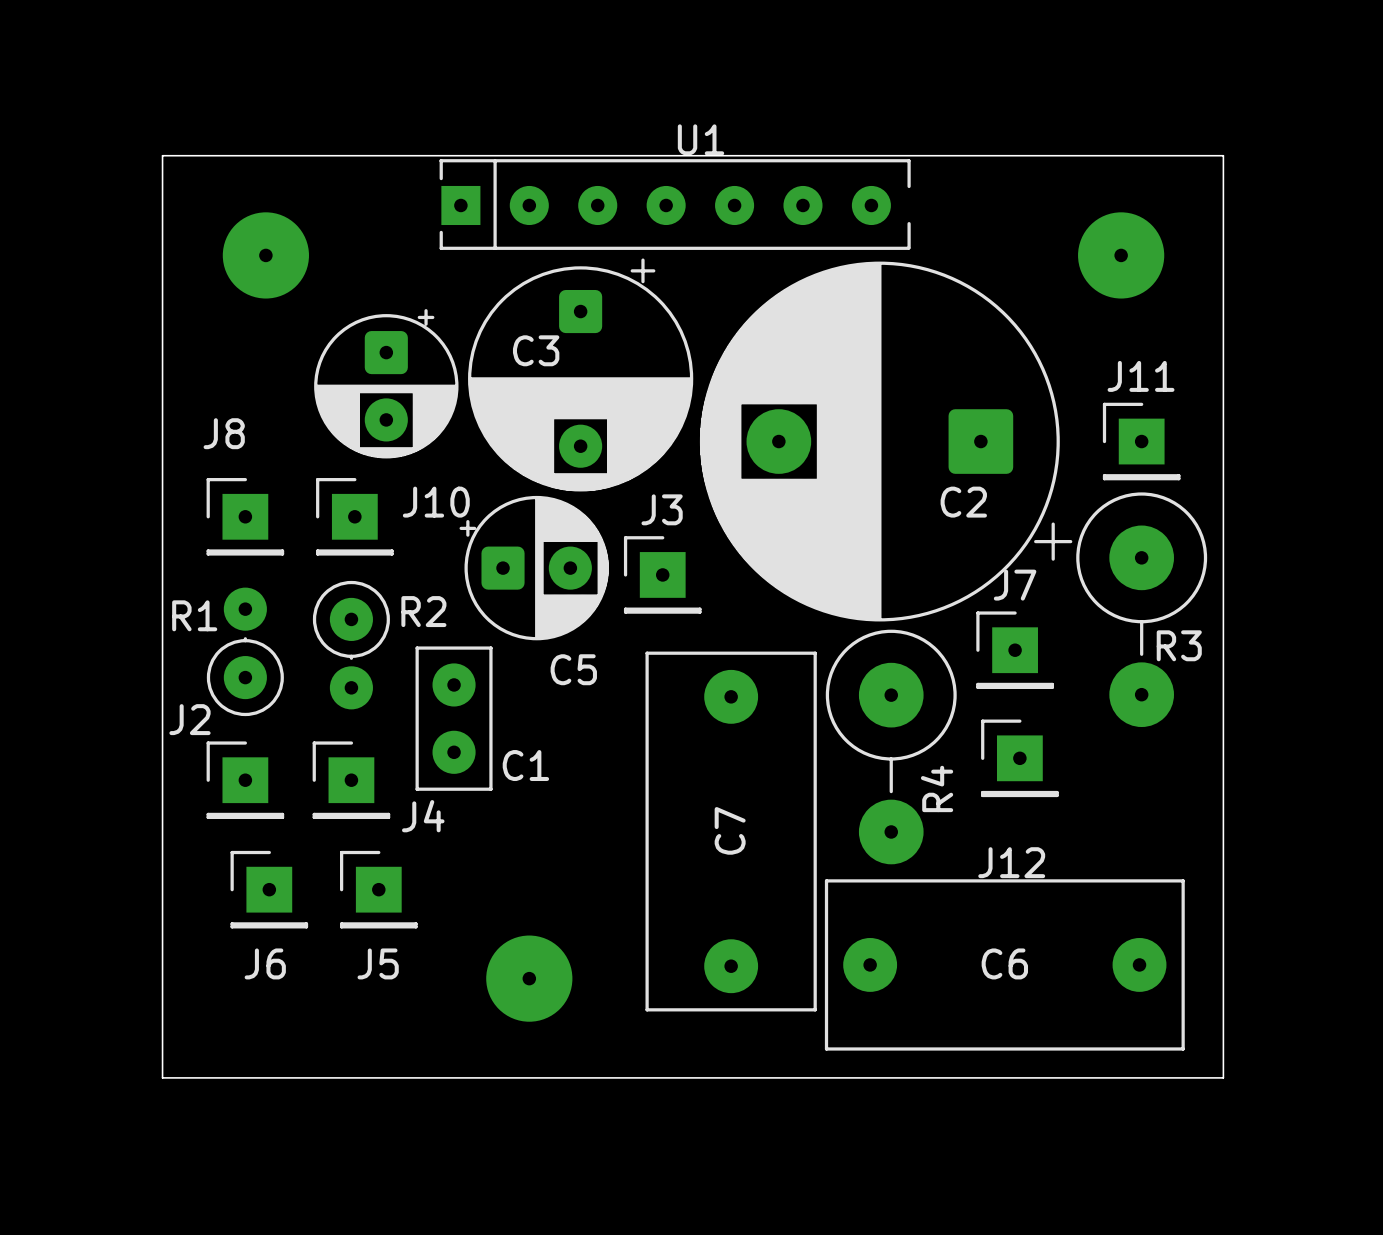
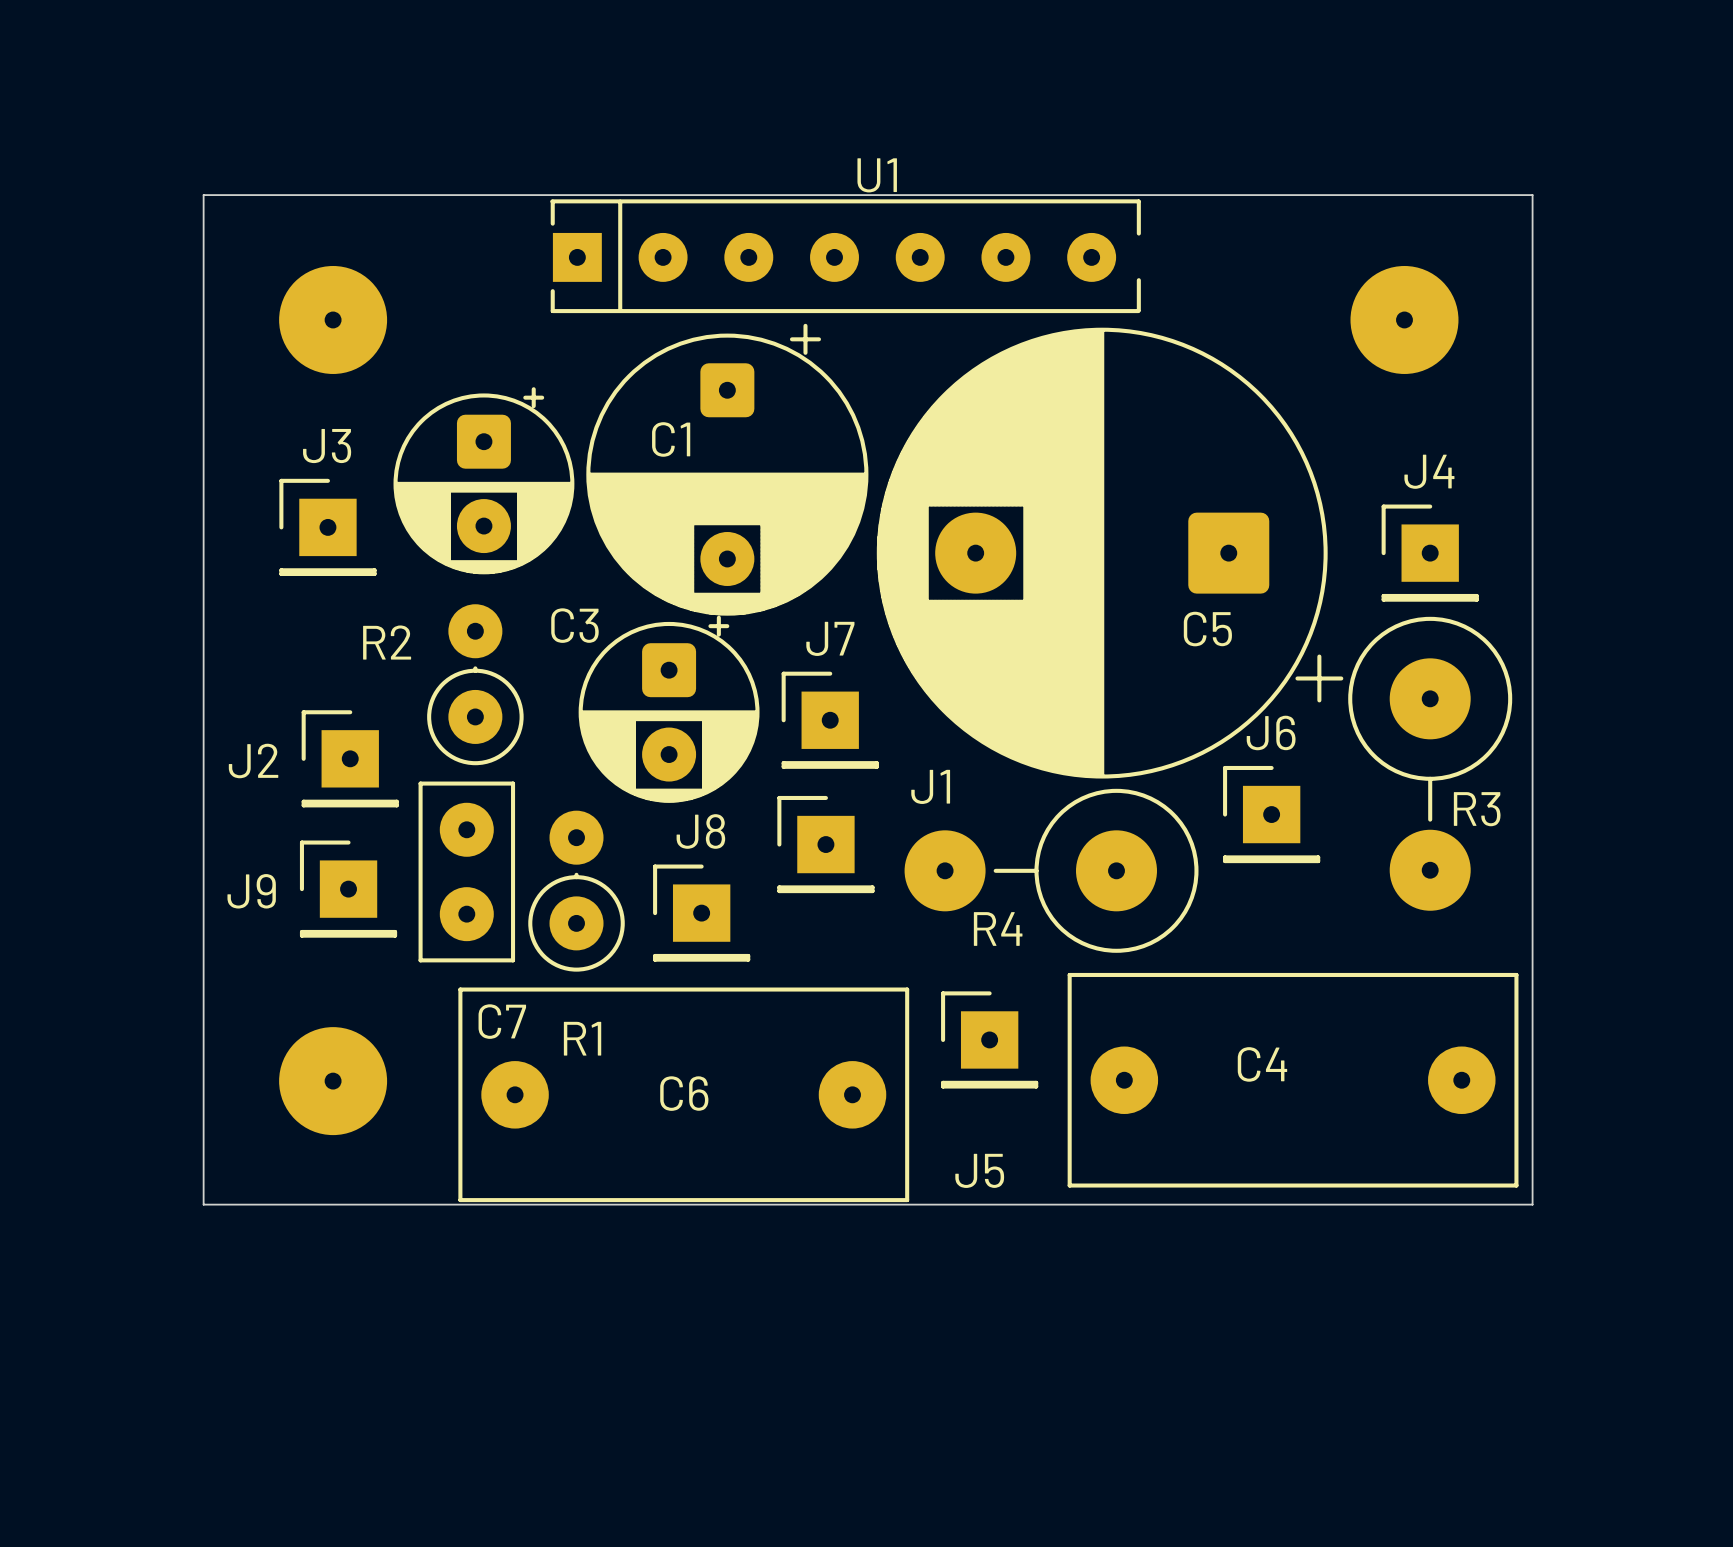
C3 name: C3 (536, 350) -> C1 (671, 439)
J11 name: J11 (1141, 376) -> J4 (1429, 471)
J3: none -> (327, 527)
J8 name position: J8 (224, 433) -> J8 (700, 831)
C2 name: C2 (963, 502) -> C5 (1207, 629)
J3 name: J3 (662, 509) -> J7 (830, 638)
J8 position: (245, 516) -> (701, 913)
J10: (354, 516) -> none
C3: none -> (669, 709)
C5: (534, 568) -> none
J7 name: J7 (1015, 585) -> J6 (1271, 732)
R2 name position: R2 (423, 611) -> R2 (387, 642)
R1 name position: R1 (194, 615) -> R1 (582, 1038)
R2 rotation: 0° (351, 645) -> 180° (475, 684)
R2 position: (351, 645) -> (475, 684)
R1 position: (245, 651) -> (576, 891)
C7 footprint: [645, 651, 817, 1012] -> [418, 781, 516, 963]
J1: none -> (825, 844)
J9: none -> (348, 889)
C1: (454, 718) -> none
J2 name position: J2 (189, 719) -> J2 (253, 760)
R4 rotation: 0° (891, 747) -> 90° clockwise (1051, 870)
J12: (1019, 758) -> none
J2 position: (245, 780) -> (350, 758)
J4: (351, 780) -> none
C7 name position: C7 (730, 830) -> C7 (502, 1021)
C4: none -> (1293, 1080)
J6: (269, 889) -> none
J5 position: (378, 889) -> (989, 1039)
board edge: (162, 961) (162, 1077) (1223, 1077) (1223, 961) -> (203, 1204) (1532, 1204)
J5 name position: J5 (378, 963) -> J5 (979, 1170)
C6 position: (1004, 964) -> (683, 1094)
part position: (529, 978) -> (333, 1081)

